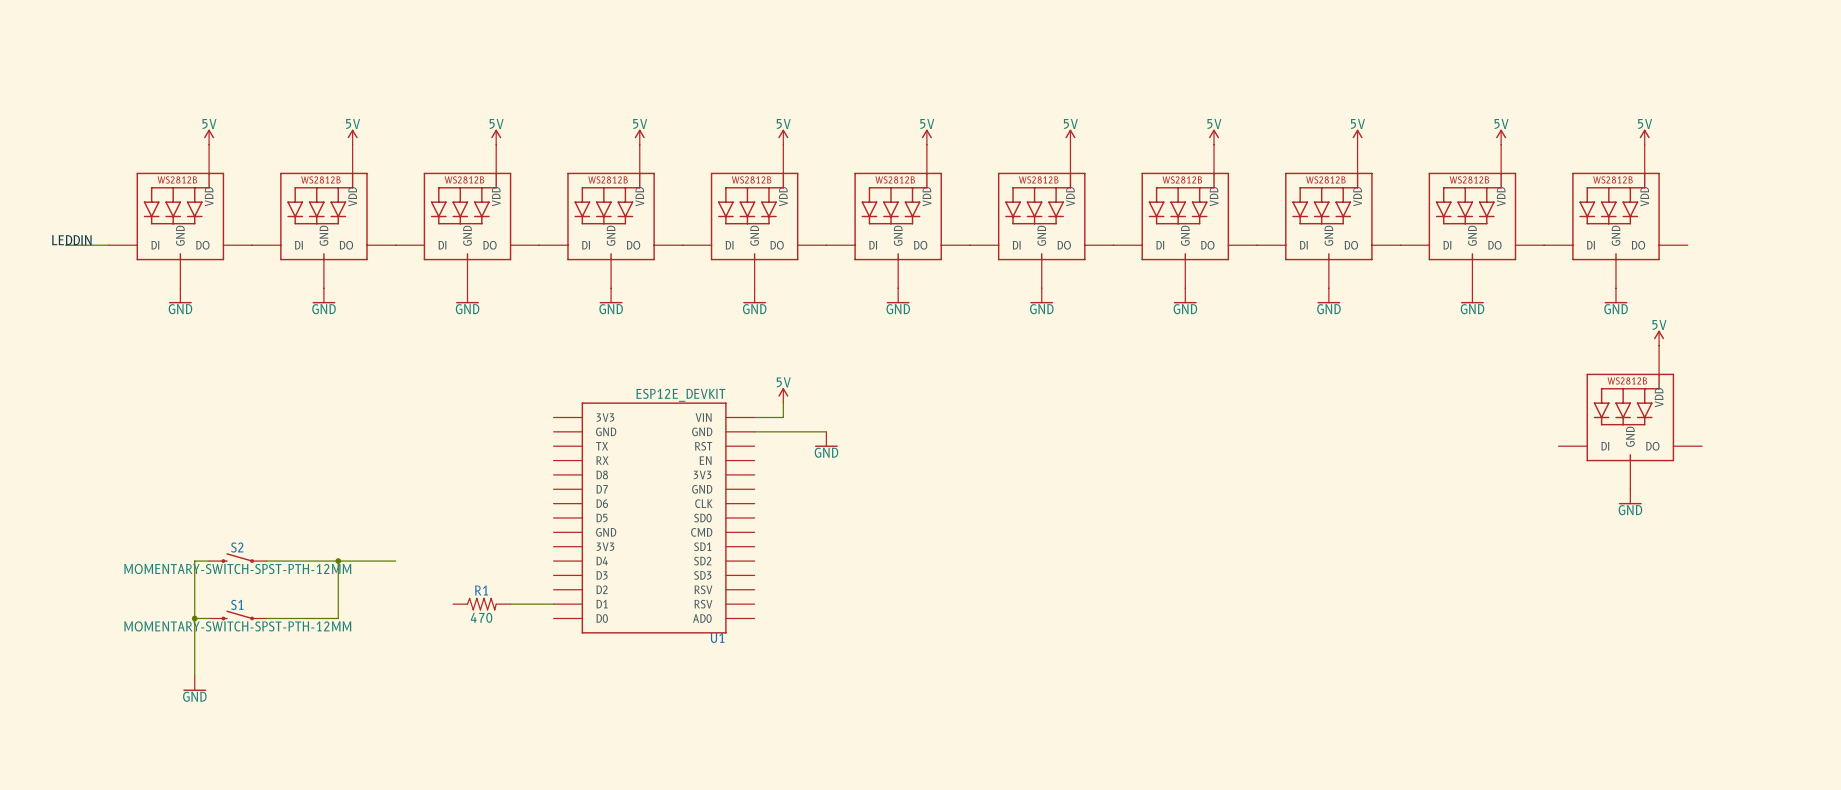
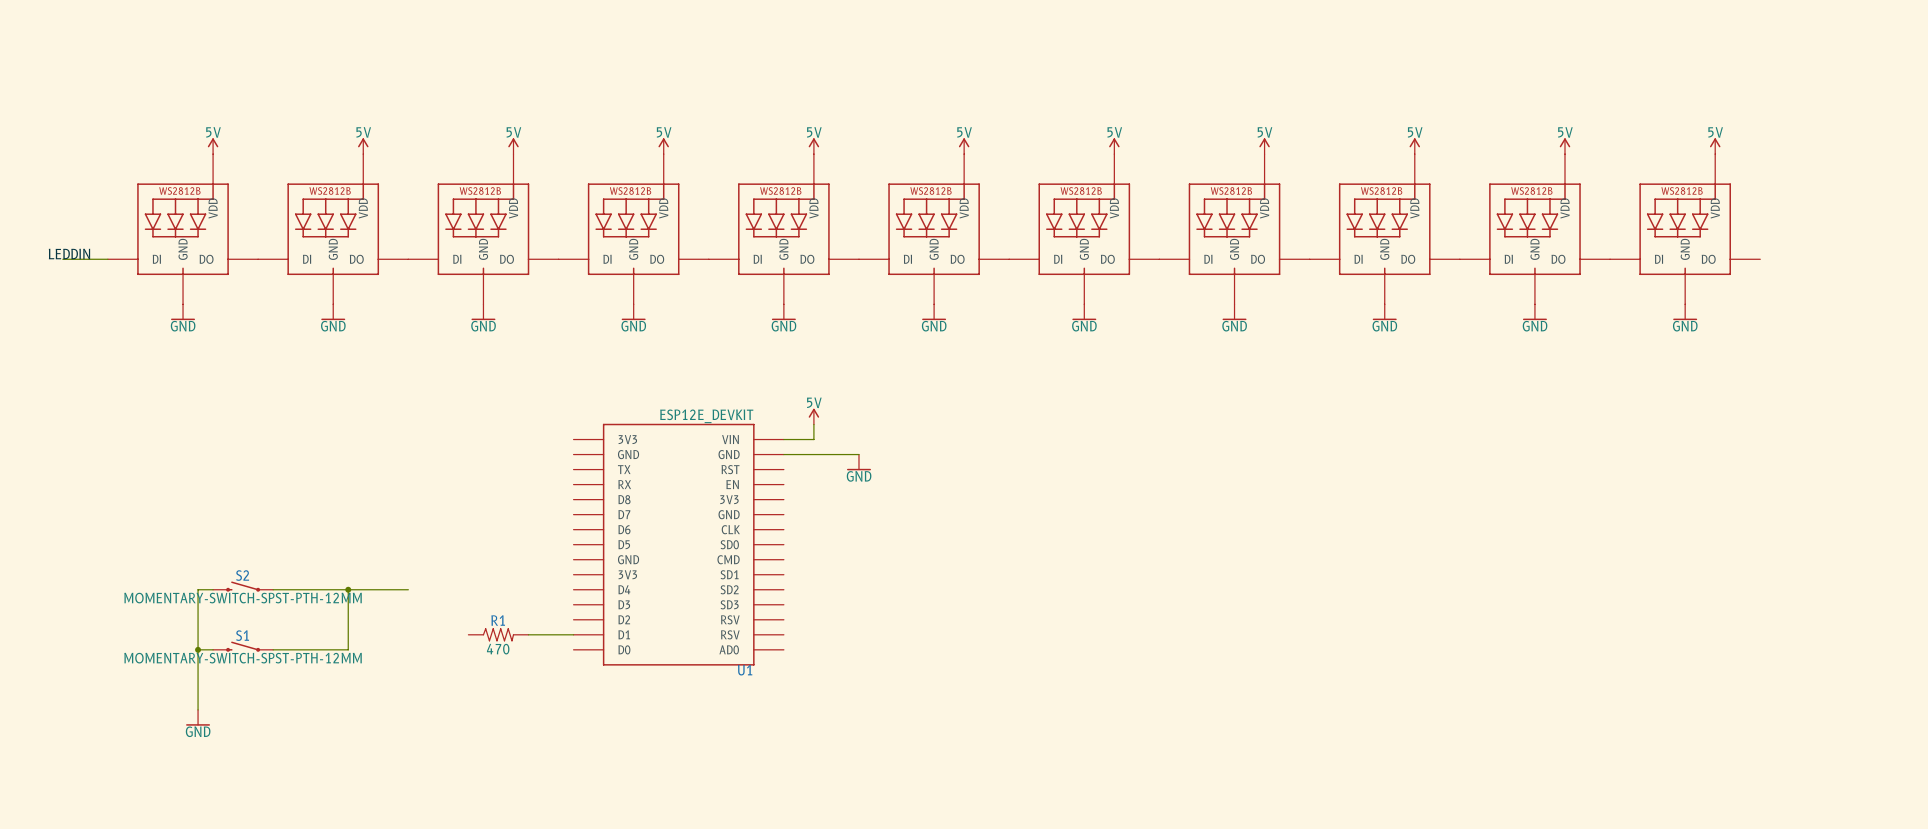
power symbol: 5V (1659, 338) -> none
part: (1630, 417) -> none
power symbol: GND (1630, 496) -> none

